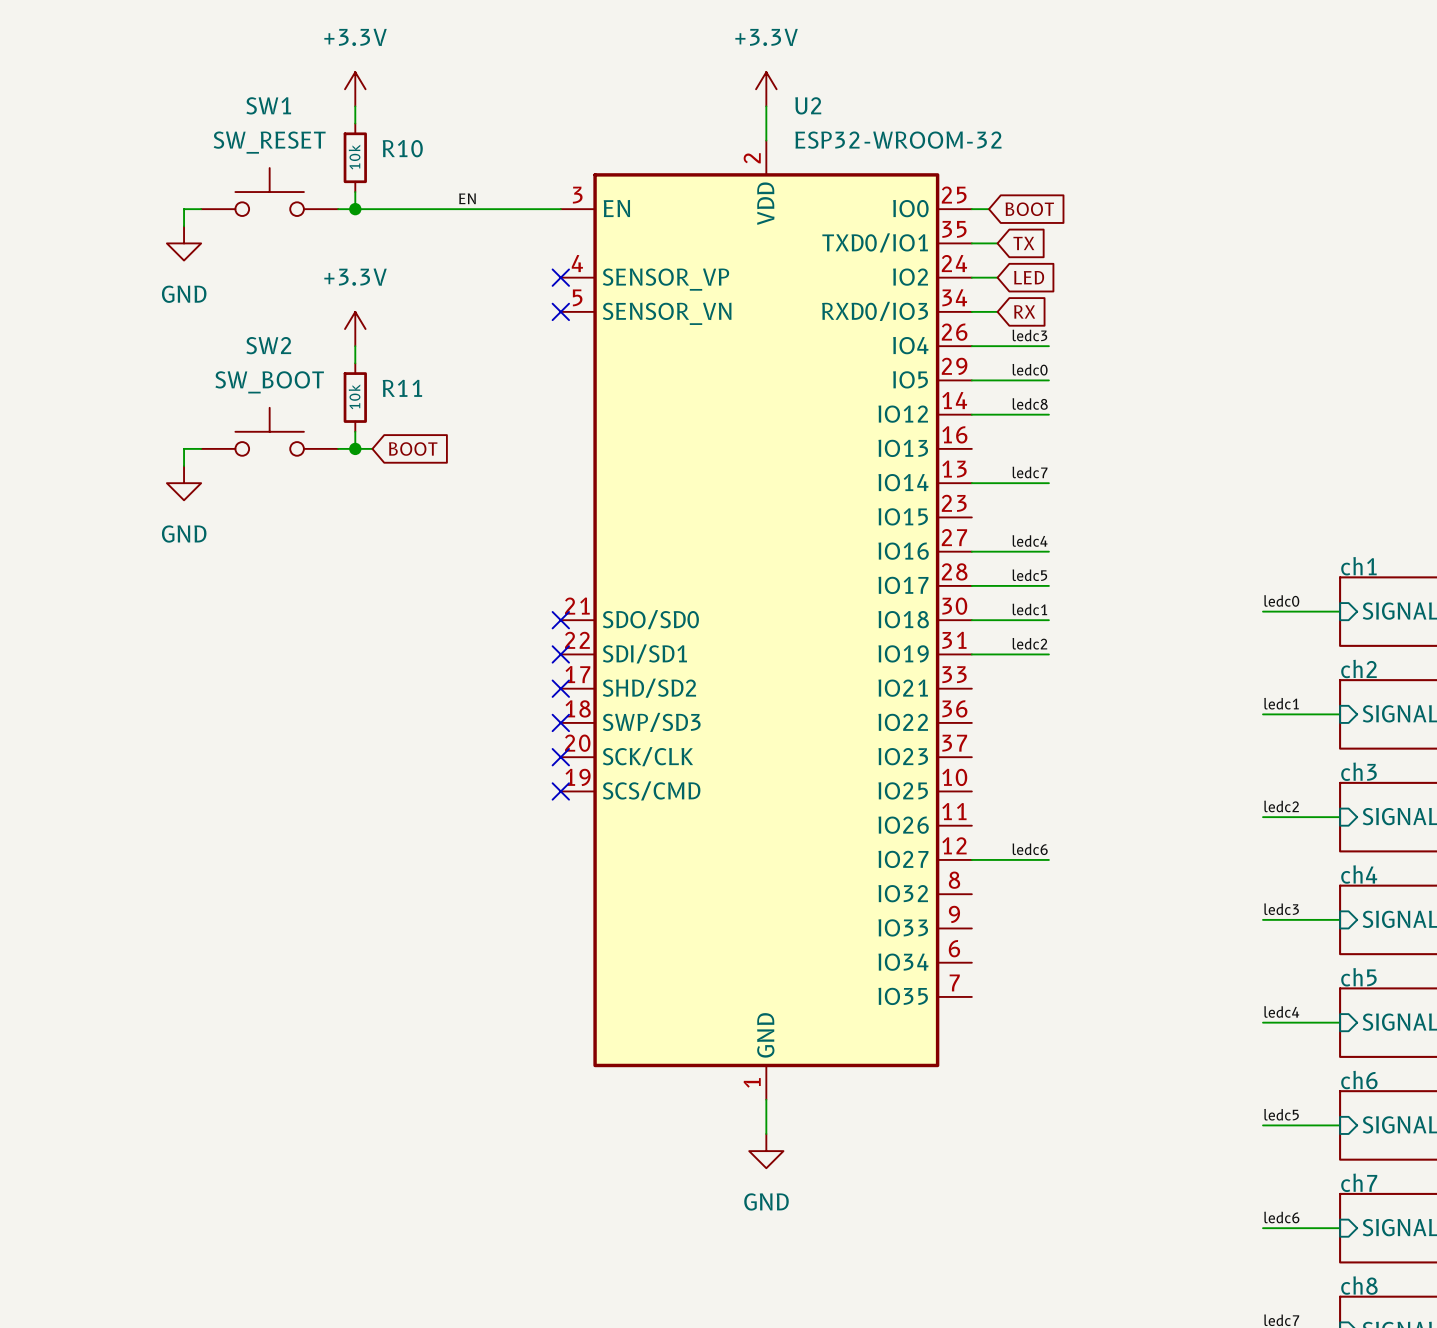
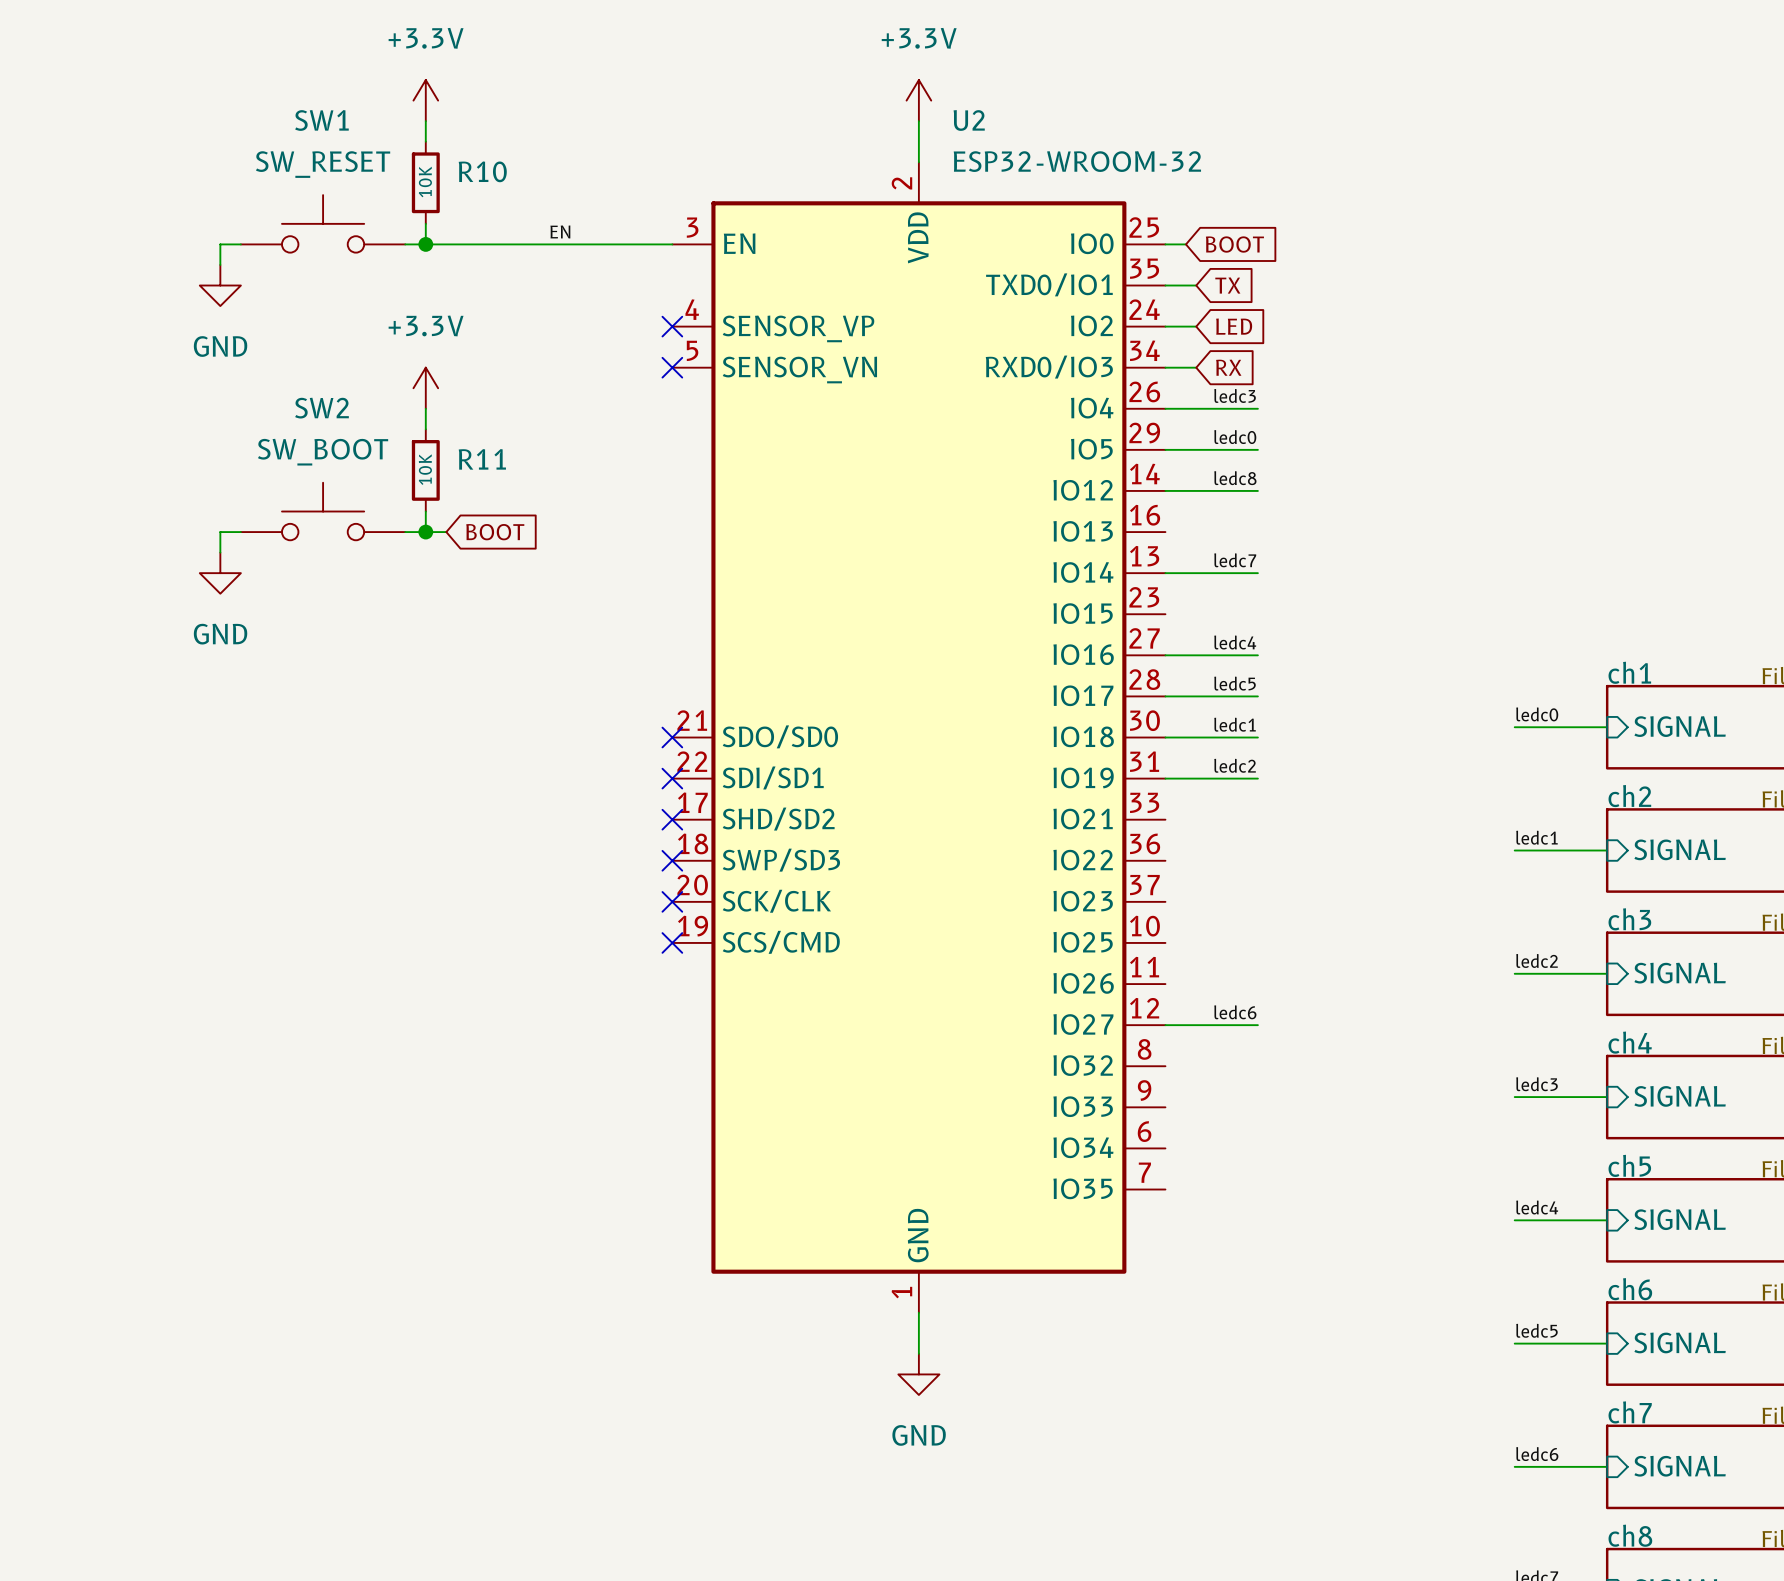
R10 value: 10k (354, 157) -> 10K (425, 181)
R11 value: 10k (354, 396) -> 10K (425, 469)

